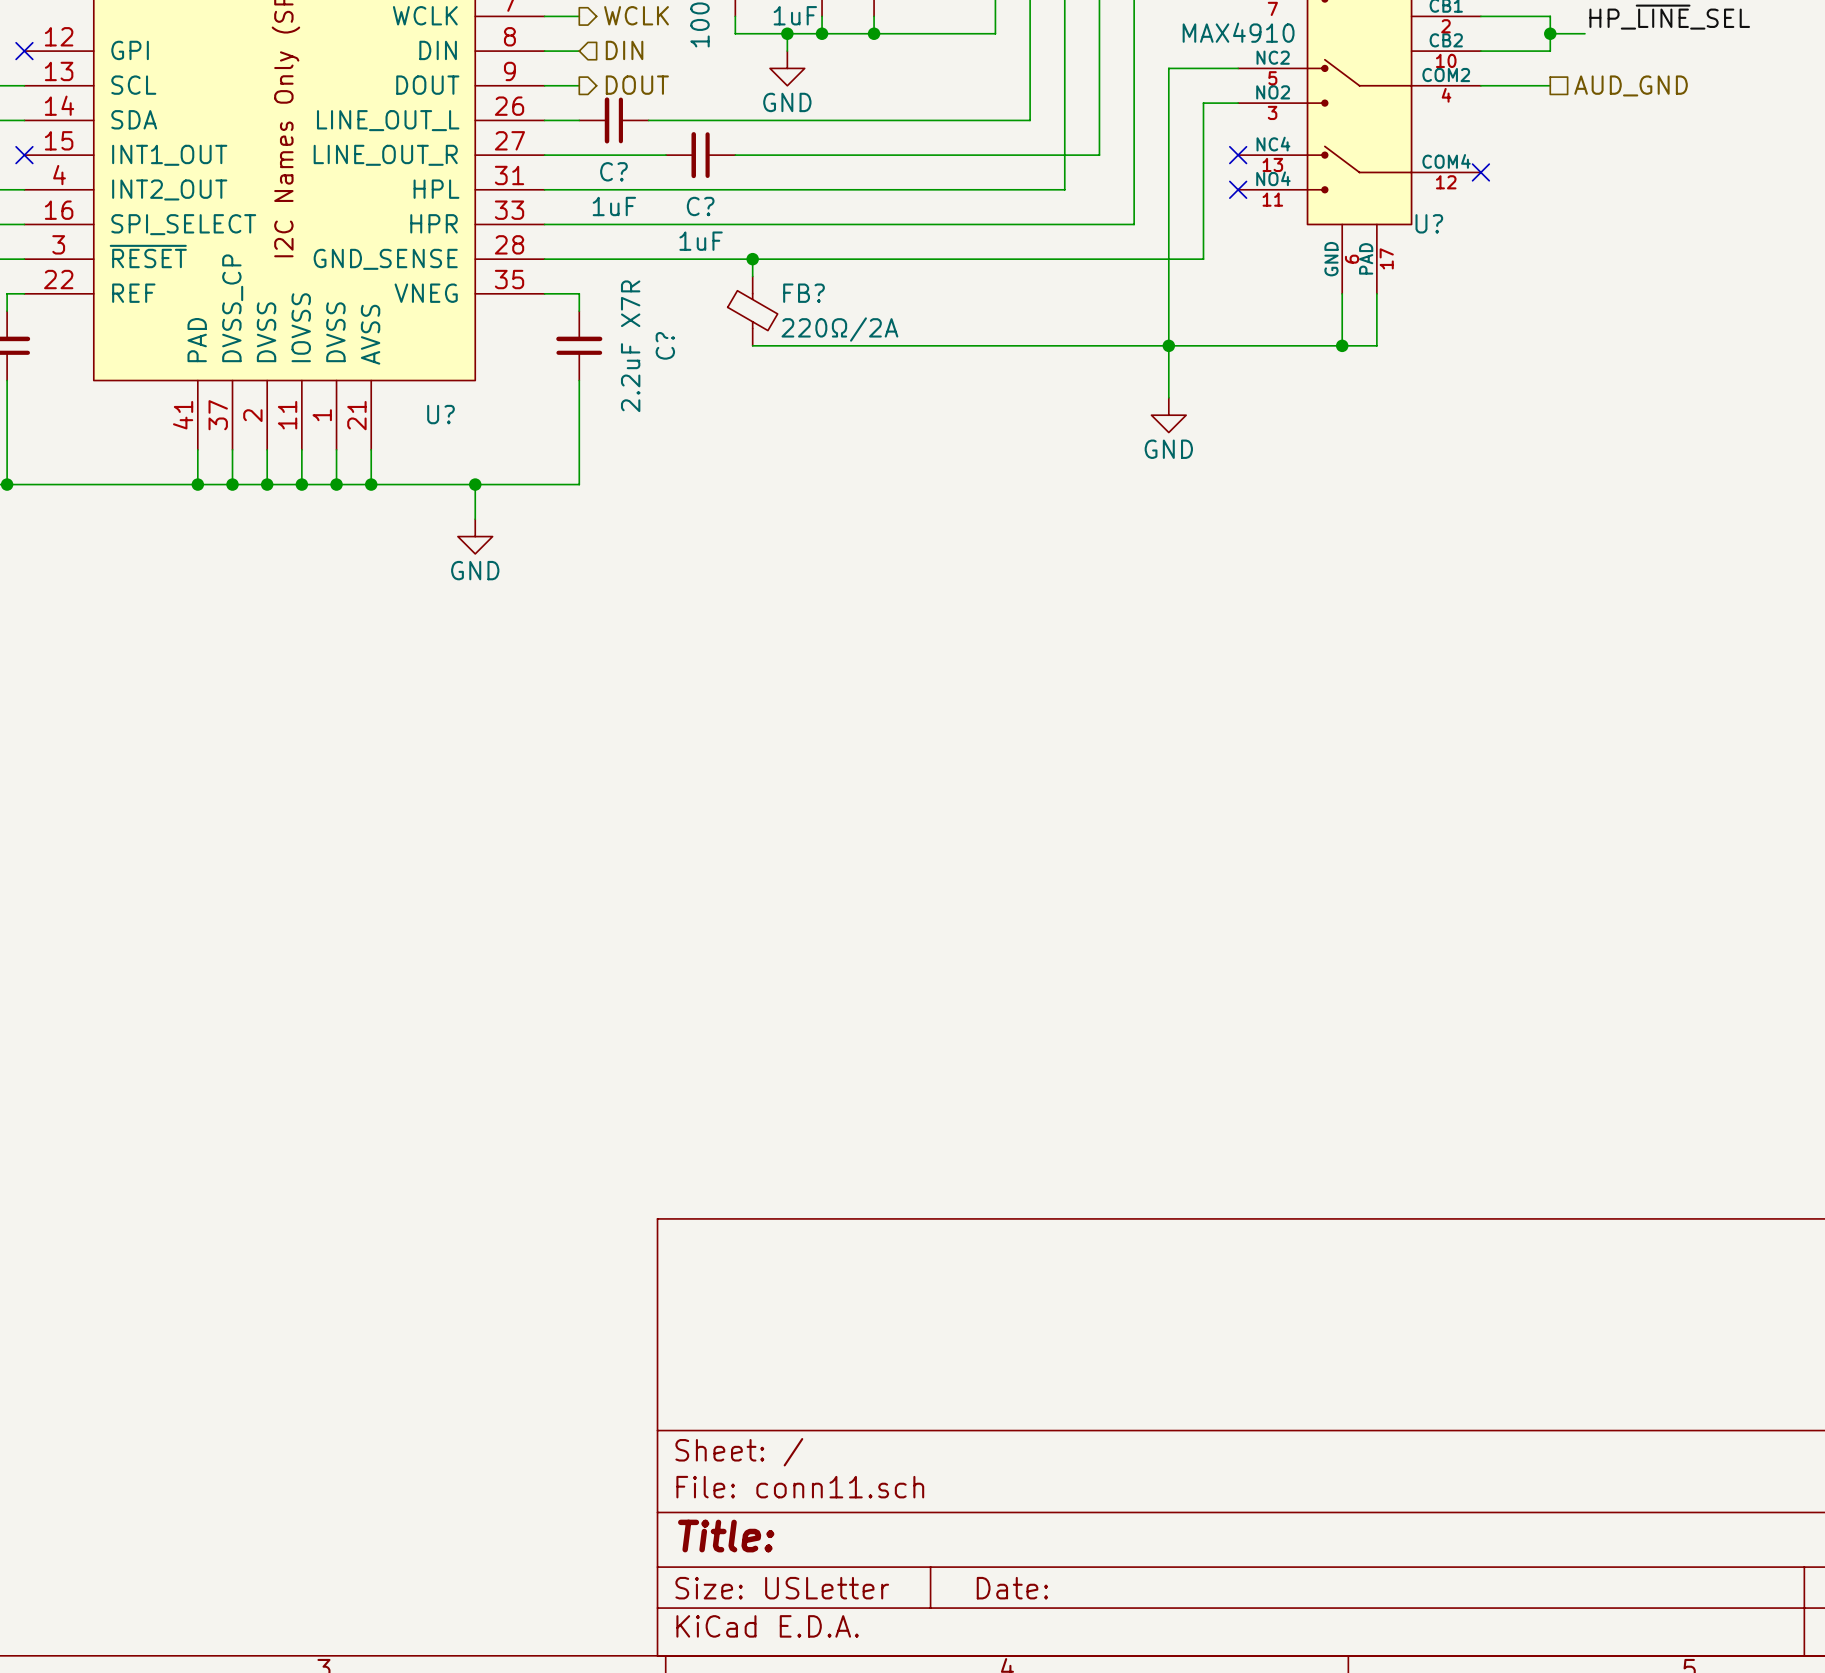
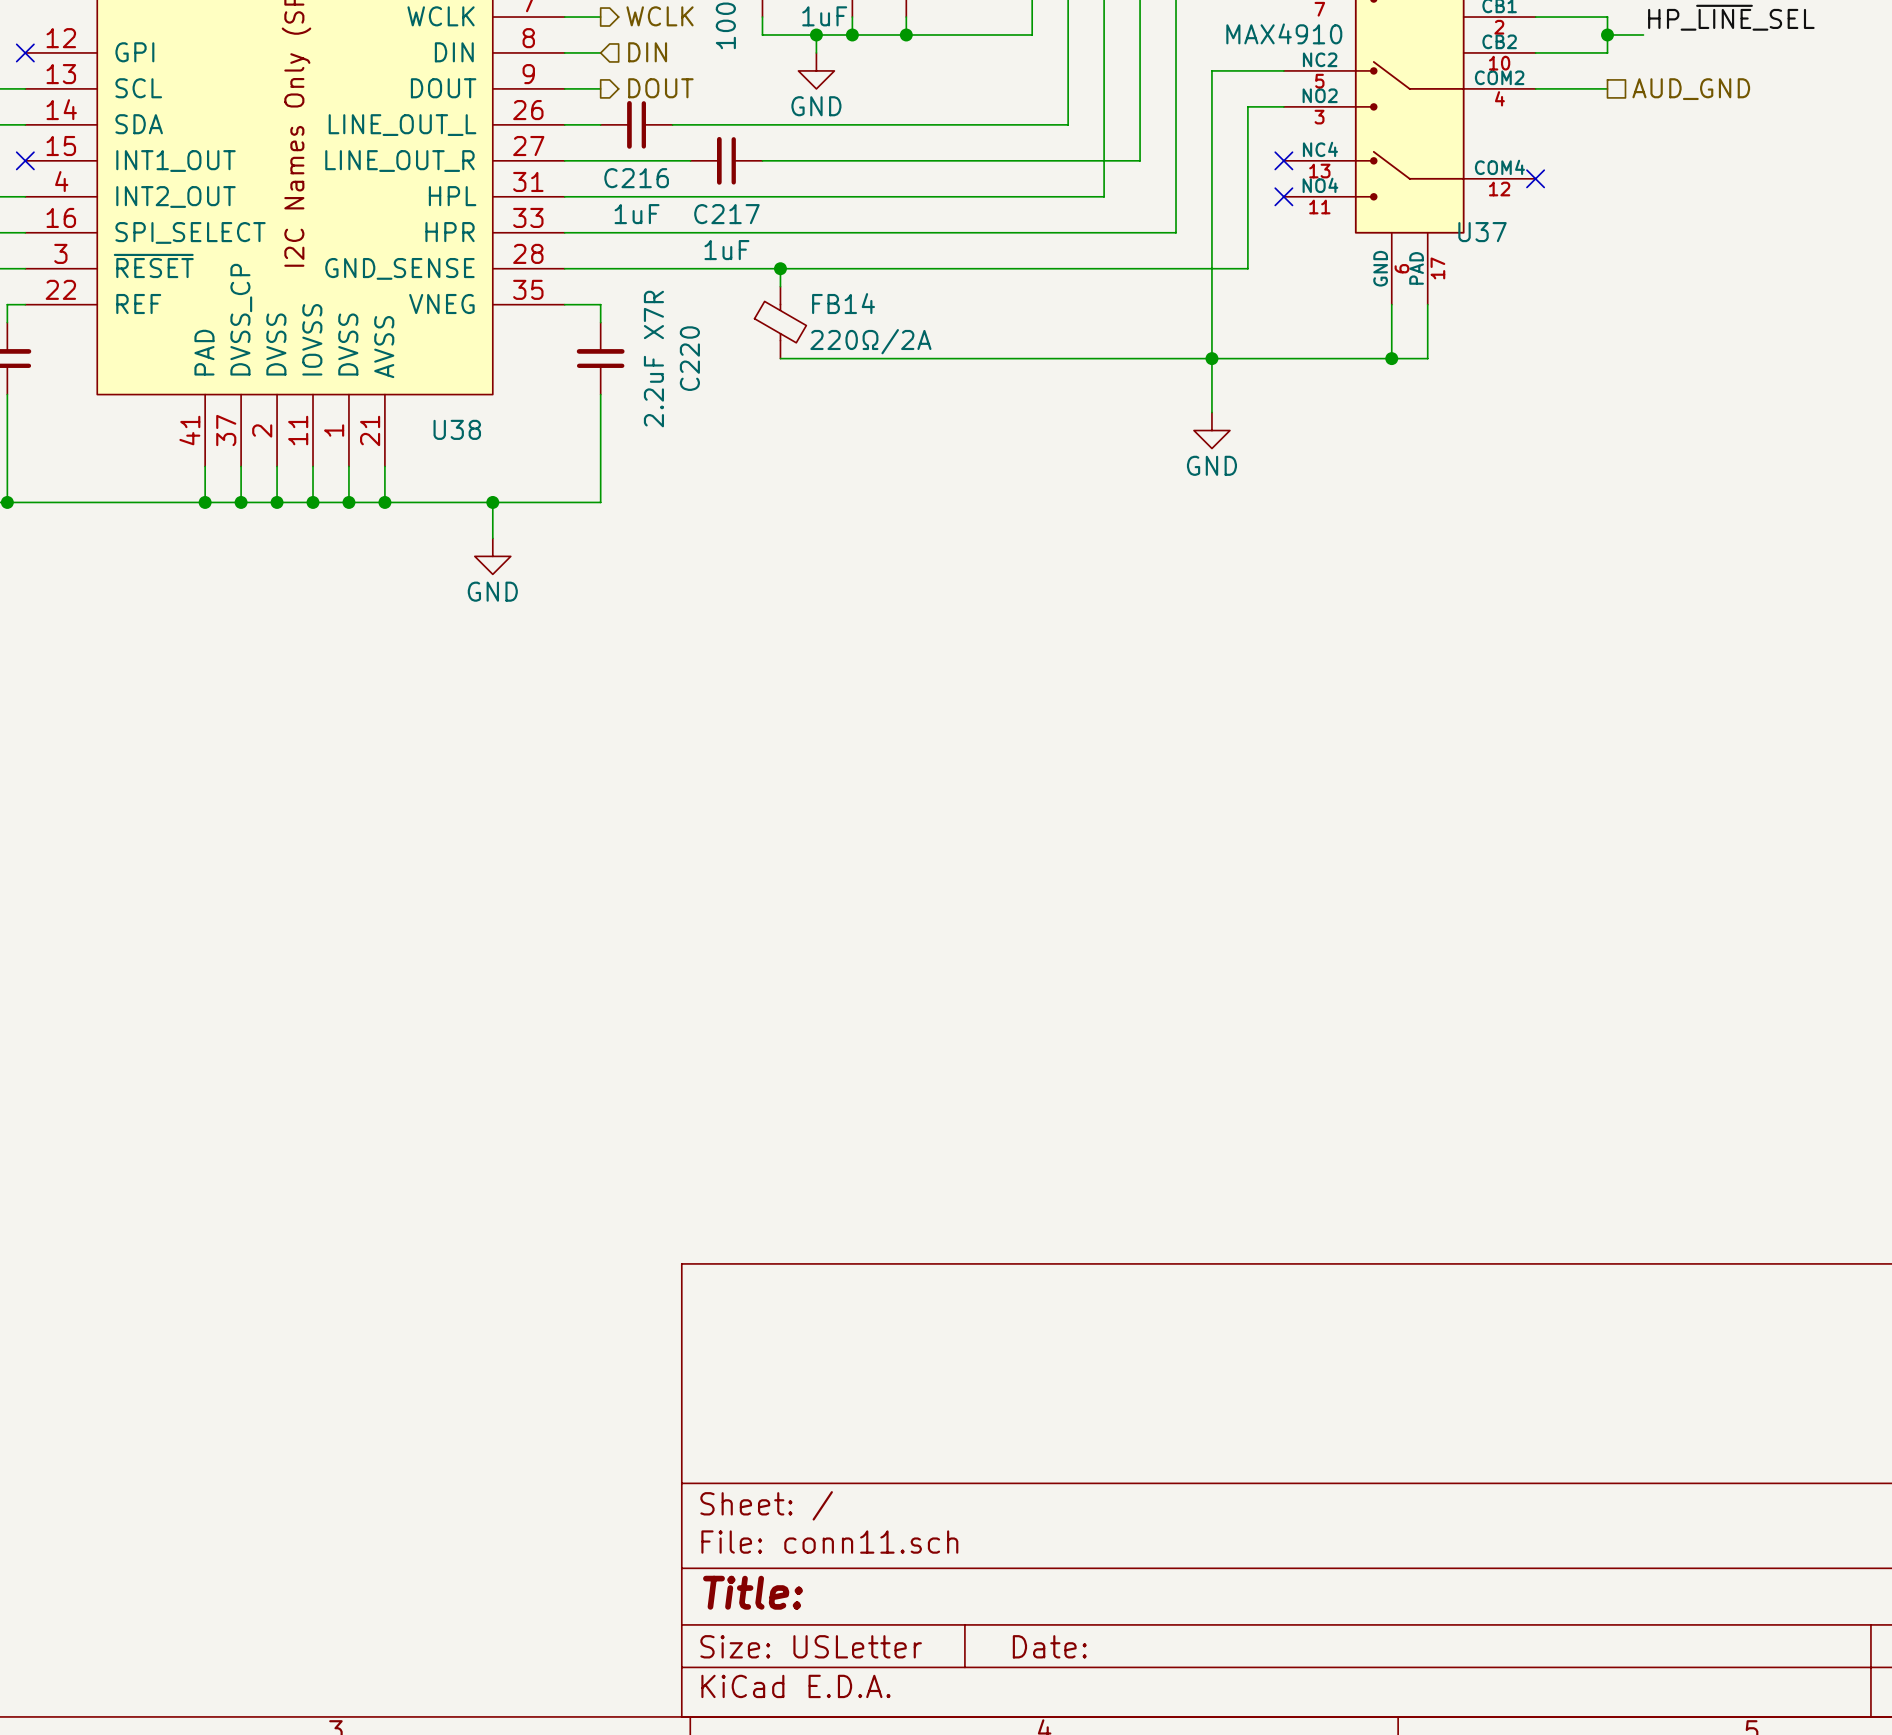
C? name: C? (613, 171) -> C216 (636, 178)
C? name: C? (700, 206) -> C217 (726, 214)
U? name: U? (1429, 223) -> U37 (1482, 232)
FB? name: FB? (804, 293) -> FB14 (843, 303)
C? name: C? (665, 345) -> C220 (689, 358)
U? name: U? (440, 414) -> U38 (457, 429)

